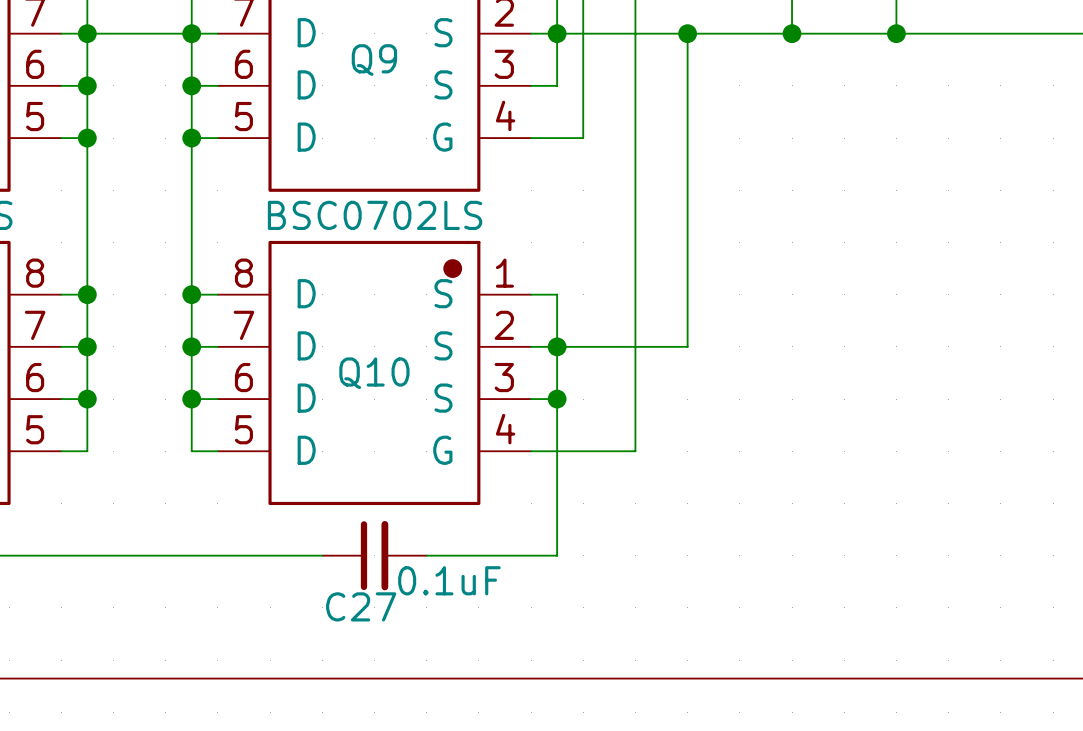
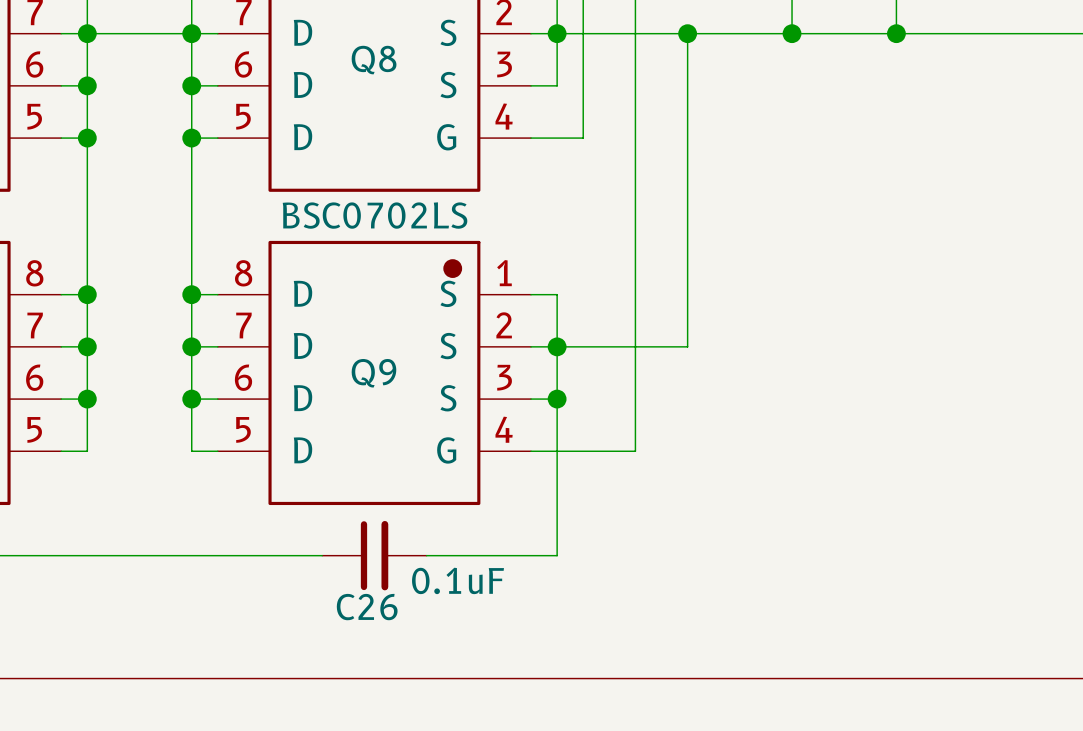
Q9 name: Q9 (374, 60) -> Q8 (374, 60)
Q10 name: Q10 (374, 373) -> Q9 (373, 373)
C27 name: C27 (361, 606) -> C26 (367, 607)

